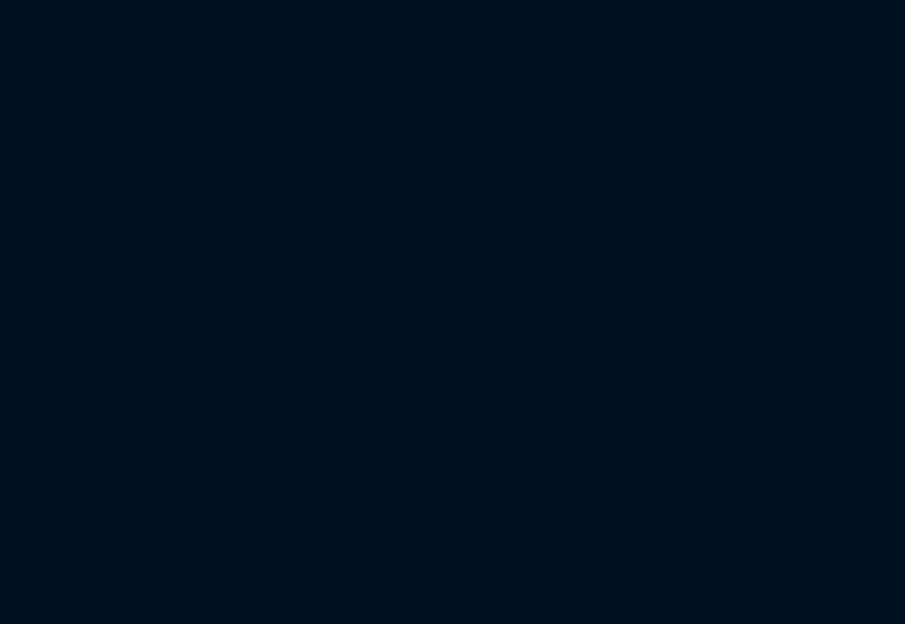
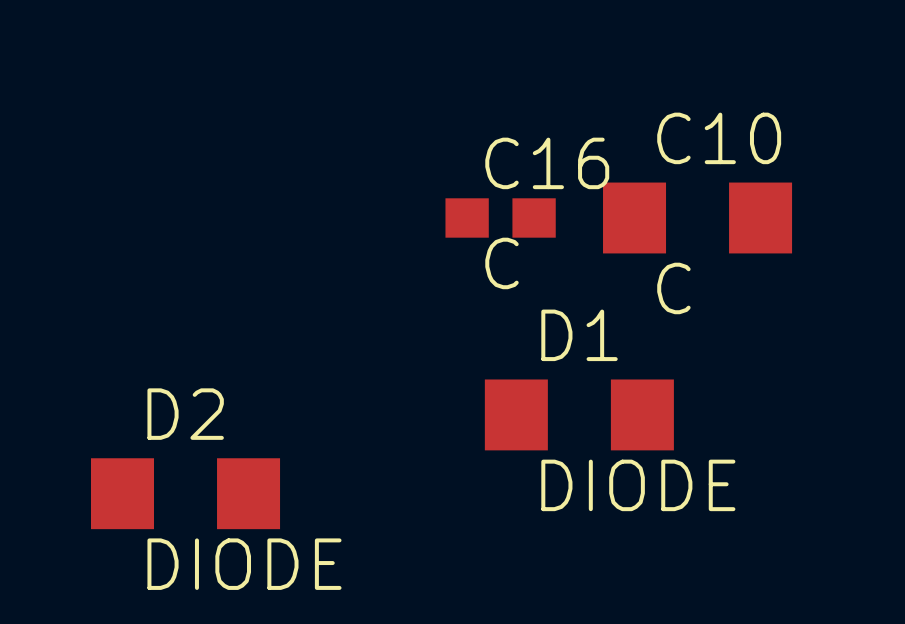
C16: none -> C (500, 217)
C10: none -> C (697, 217)
D1: none -> DIODE (579, 414)
D2: none -> DIODE (185, 493)

